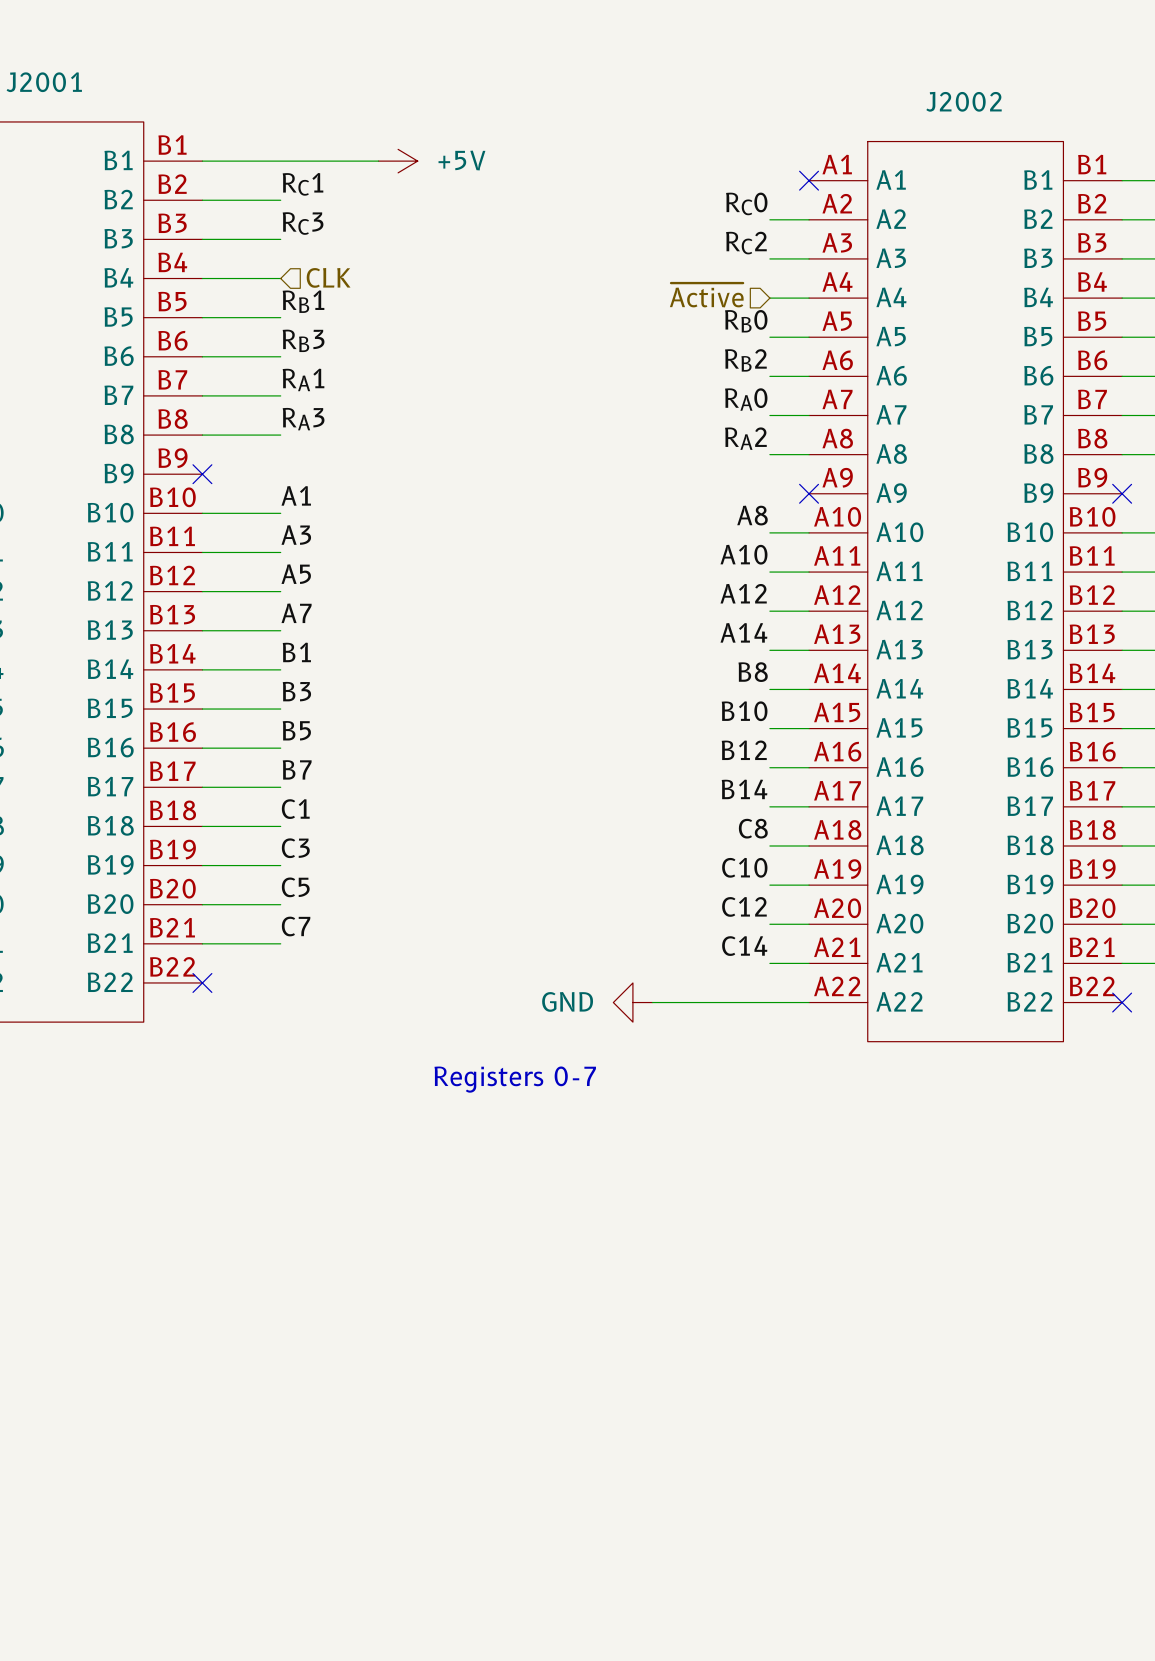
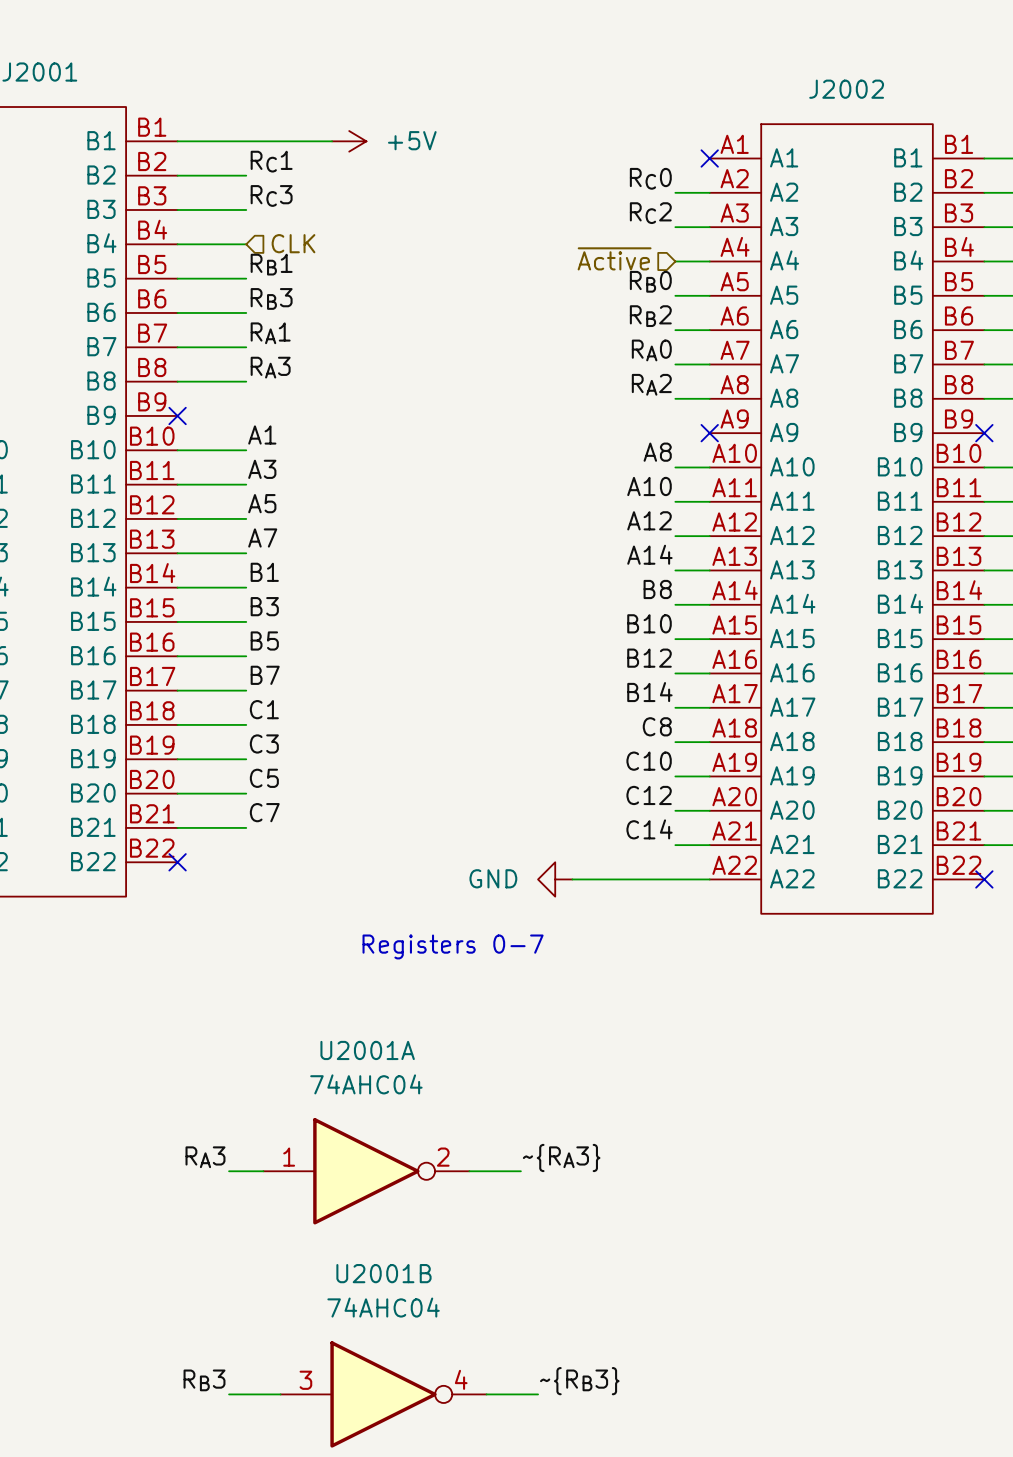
label: none -> RA3 (205, 1157)
label: none -> ~{RA3} (561, 1157)
wire: none -> (229, 1171) (263, 1171)
U2001A: none -> 74AHC04 (366, 1171)
wire: none -> (469, 1171) (520, 1171)
label: none -> RB3 (204, 1380)
label: none -> ~{RB3} (579, 1381)
wire: none -> (229, 1394) (280, 1394)
U2001B: none -> 74AHC04 (383, 1394)
wire: none -> (486, 1394) (538, 1394)

